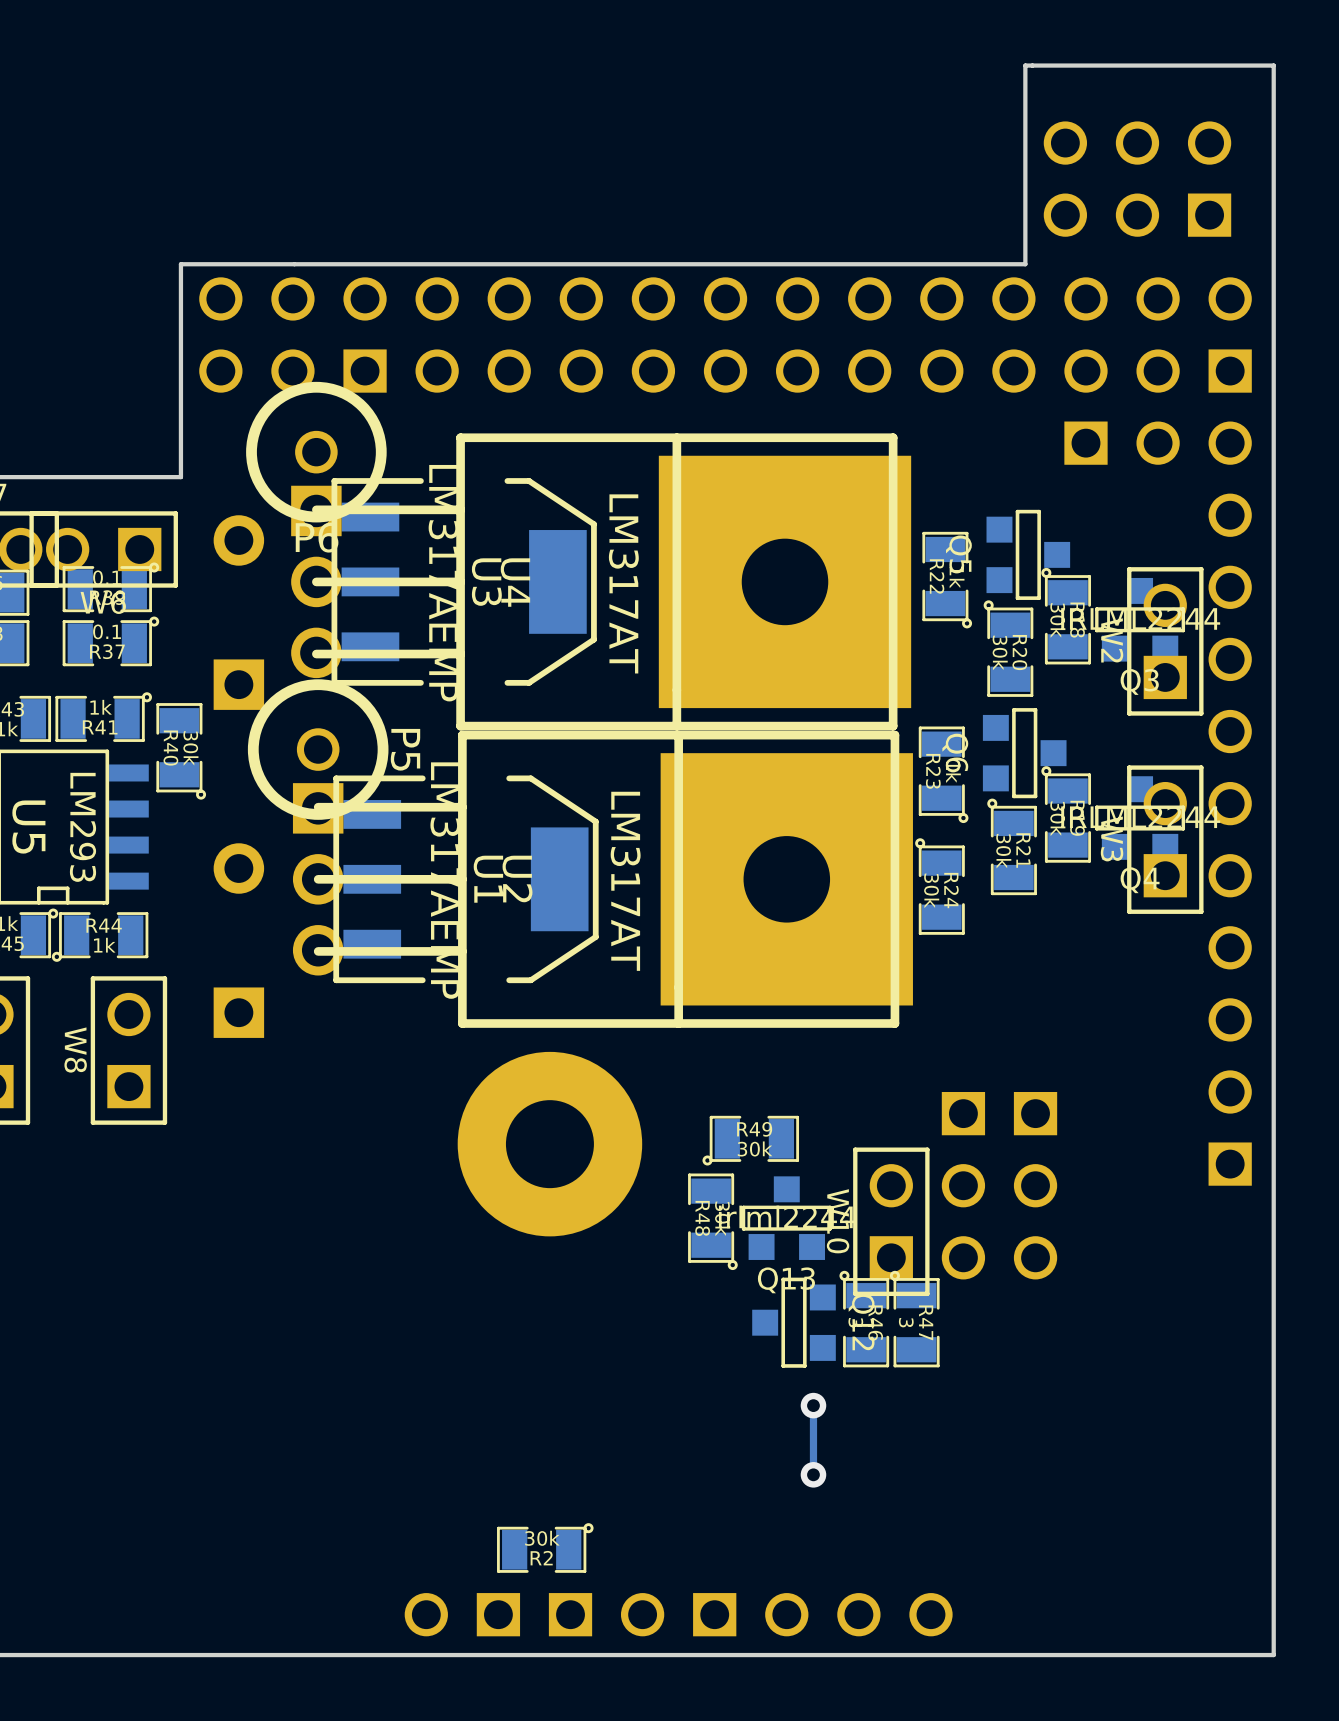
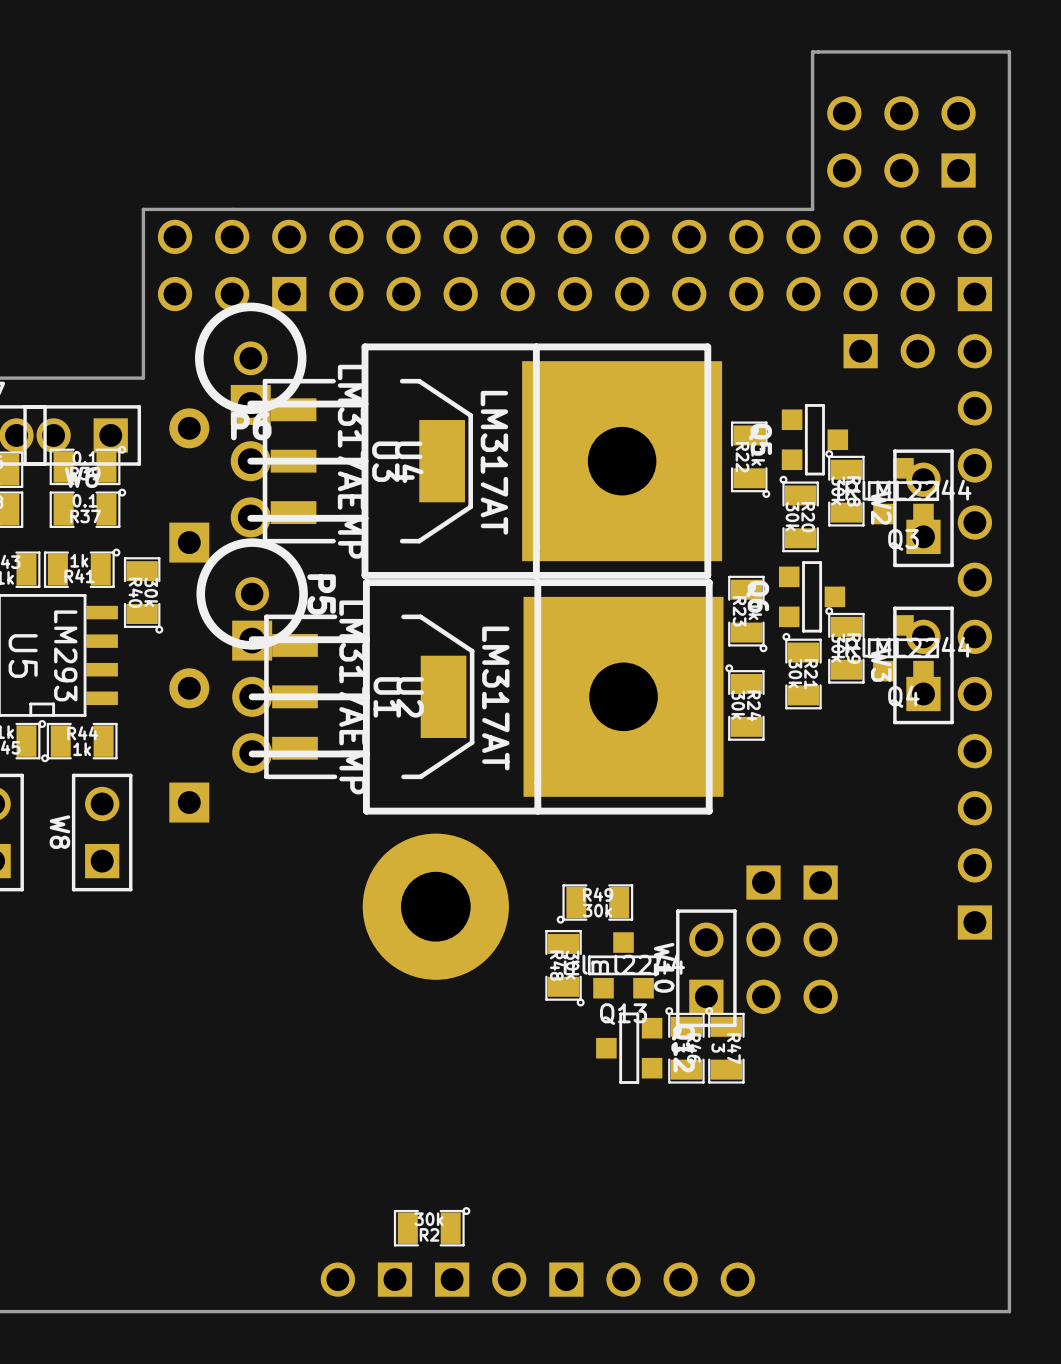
track: (813, 1405) (813, 1474) -> none
via: (813, 1405) -> none
via: (813, 1474) -> none

